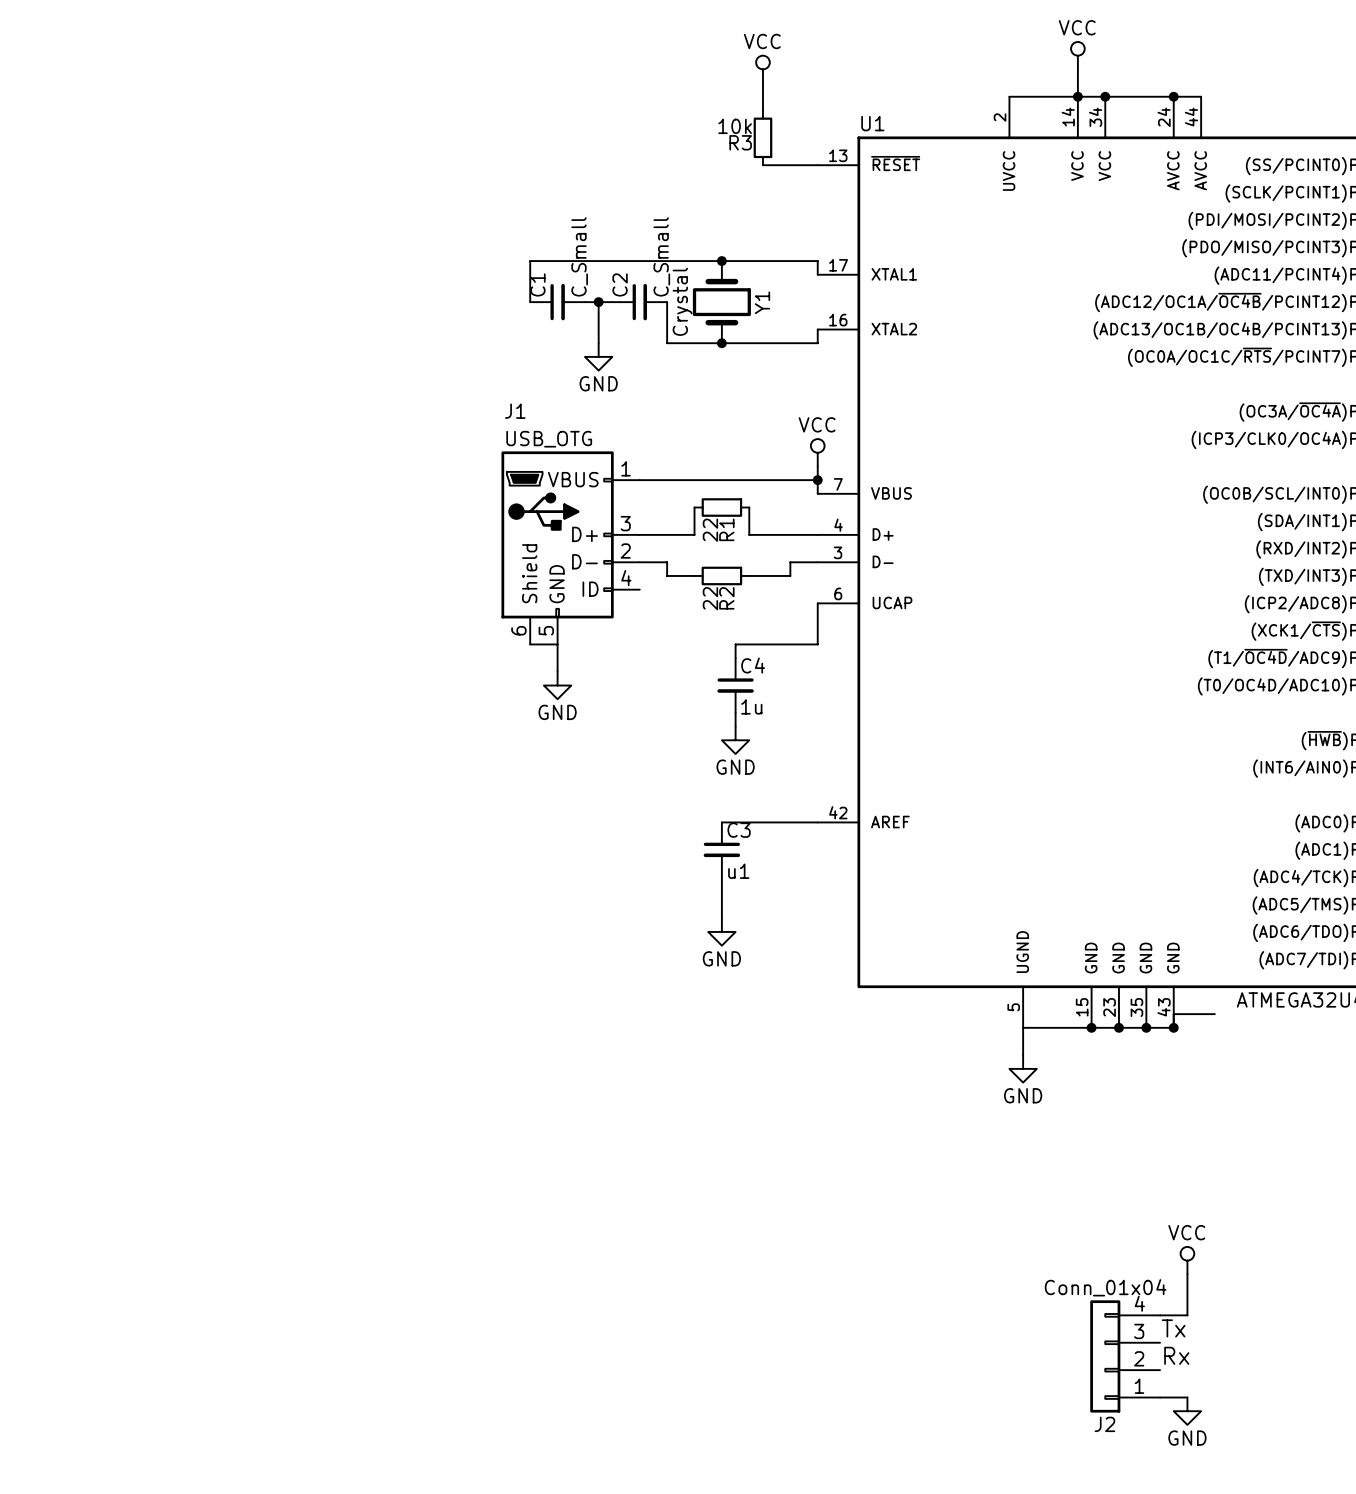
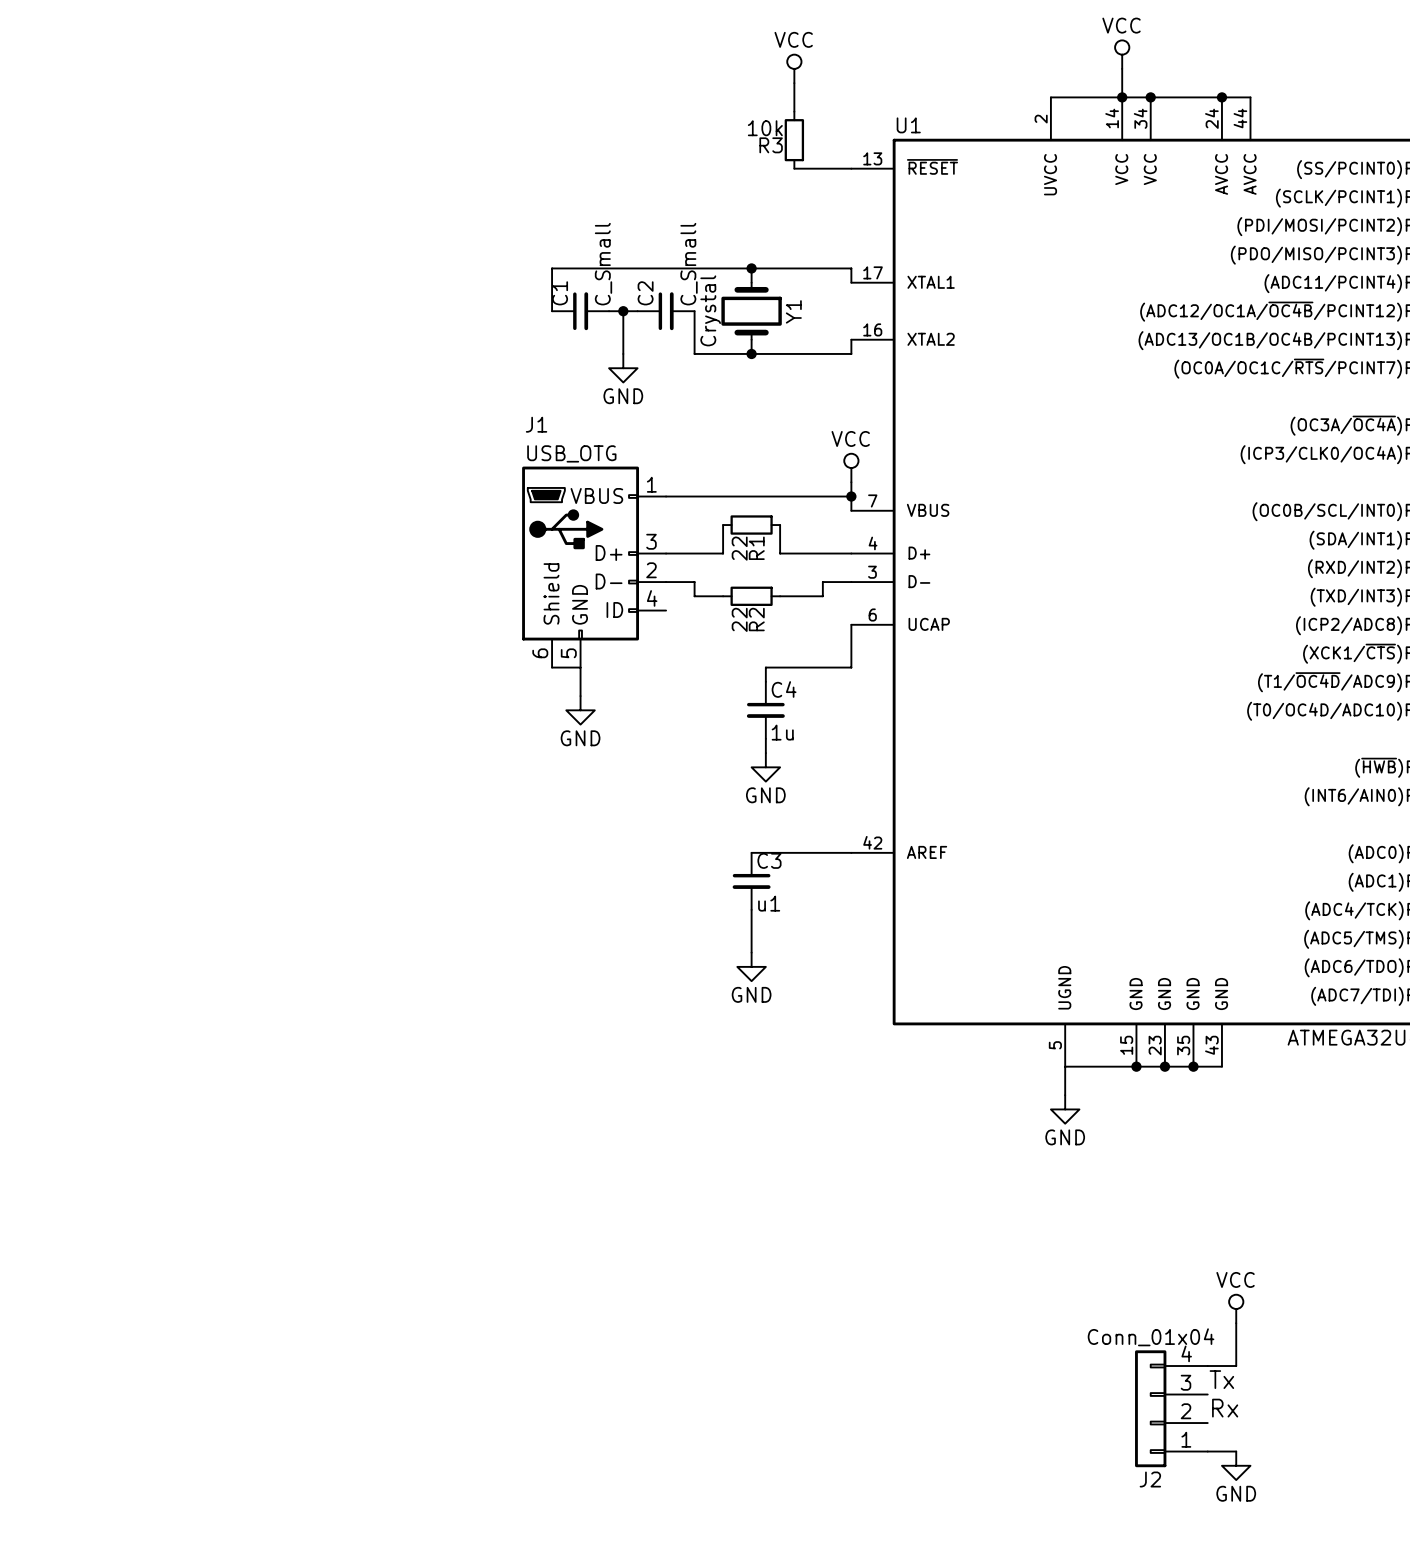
wire: (1214, 1014) (1173, 1014) (1173, 1027) -> none
junction: (1173, 1027) -> none

